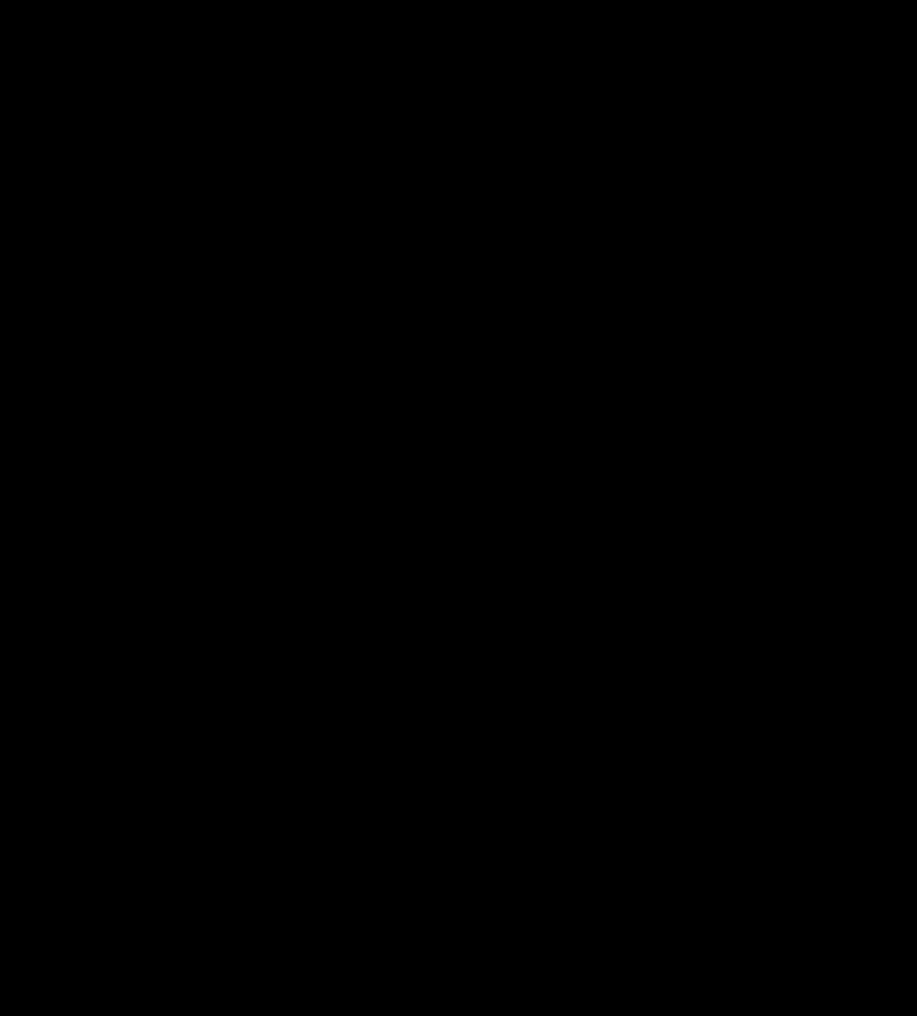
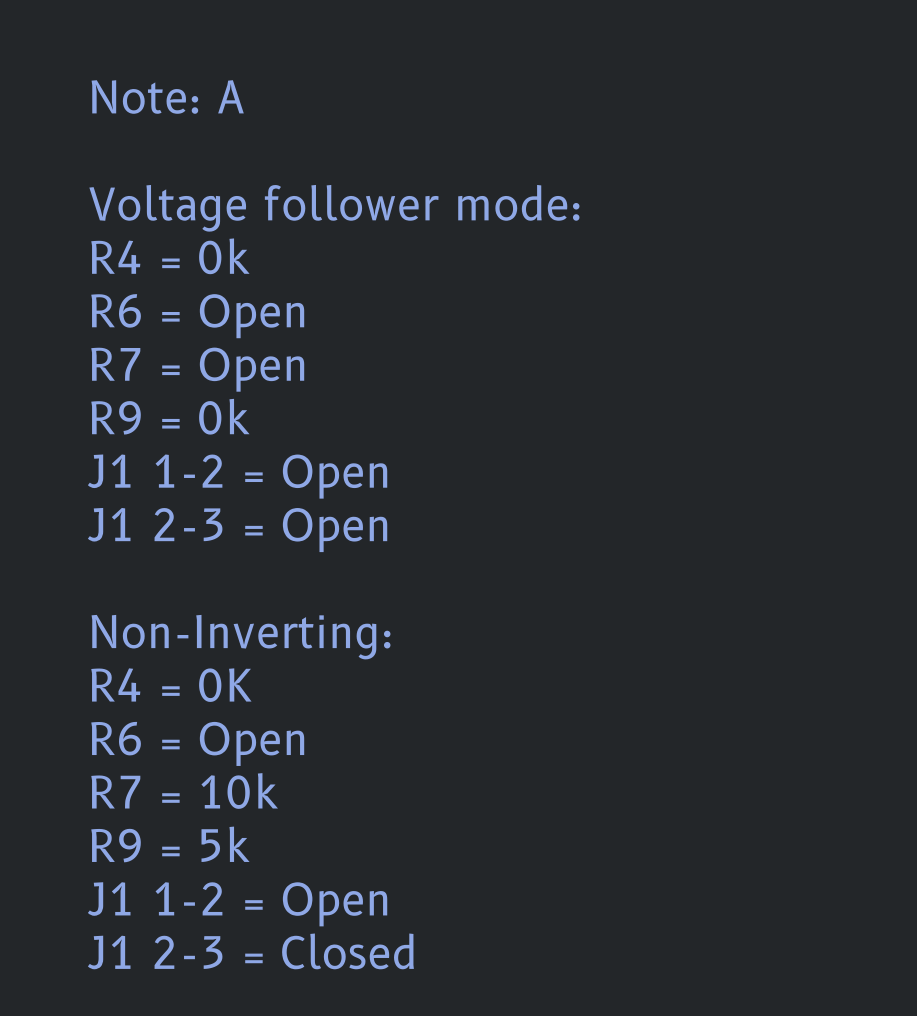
text: none -> Note: A (167, 96)
text: none -> Voltage follower mode: (334, 208)
text: none -> R4 = 0k (170, 256)
text: none -> R6 = Open (197, 316)
text: none -> R7 = Open (197, 369)
text: none -> R9 = 0k (170, 416)
text: none -> J1 1-2 = Open (237, 476)
text: none -> J1 2-3 = Open (237, 530)
text: none -> Non-Inverting: (241, 637)
text: none -> R4 = 0K (171, 685)
text: none -> R6 = Open (197, 743)
text: none -> R7 = 10k (184, 790)
text: none -> R9 = 5k (170, 844)
text: none -> J1 1-2 = Open (237, 904)
text: none -> J1 2-3 = Closed (250, 951)

